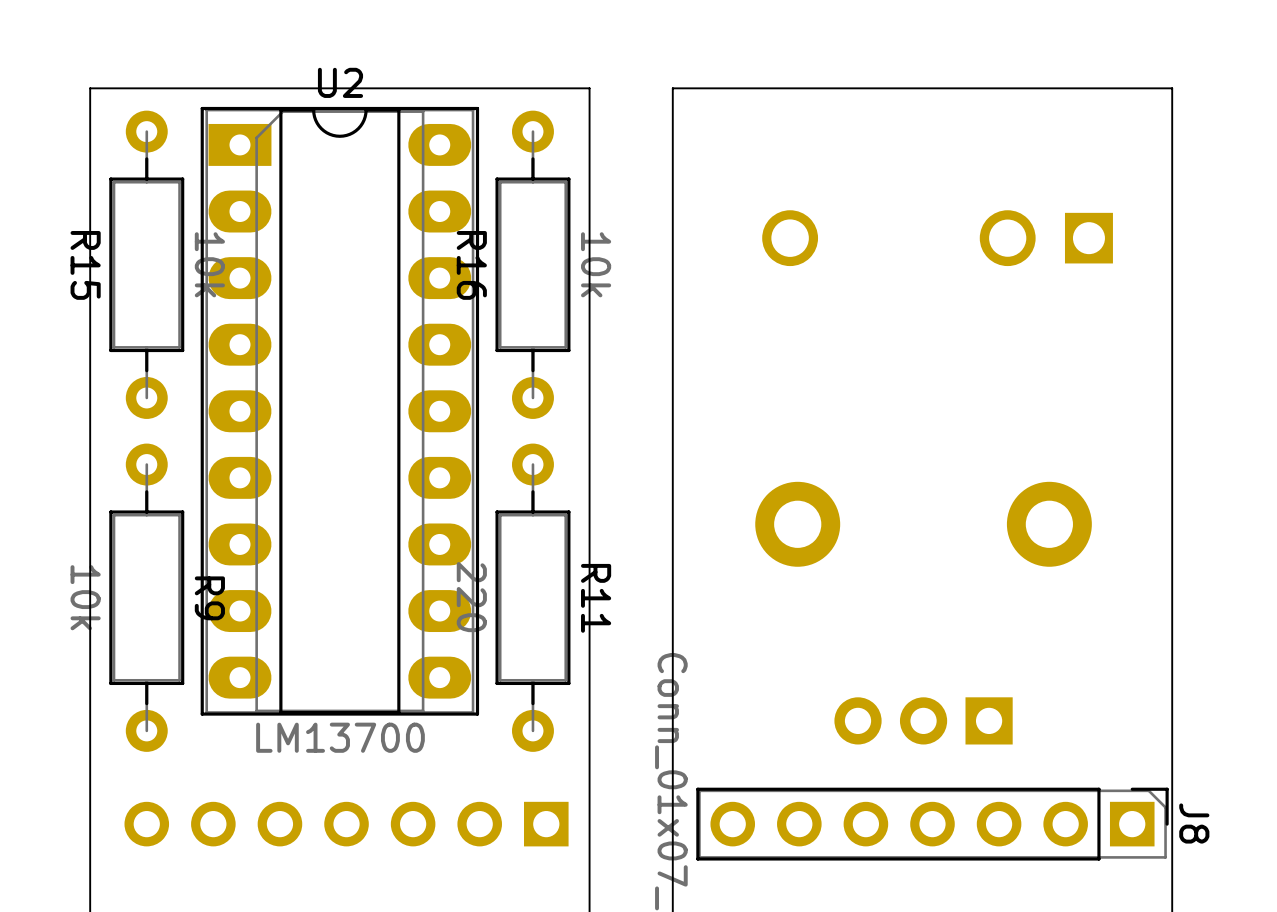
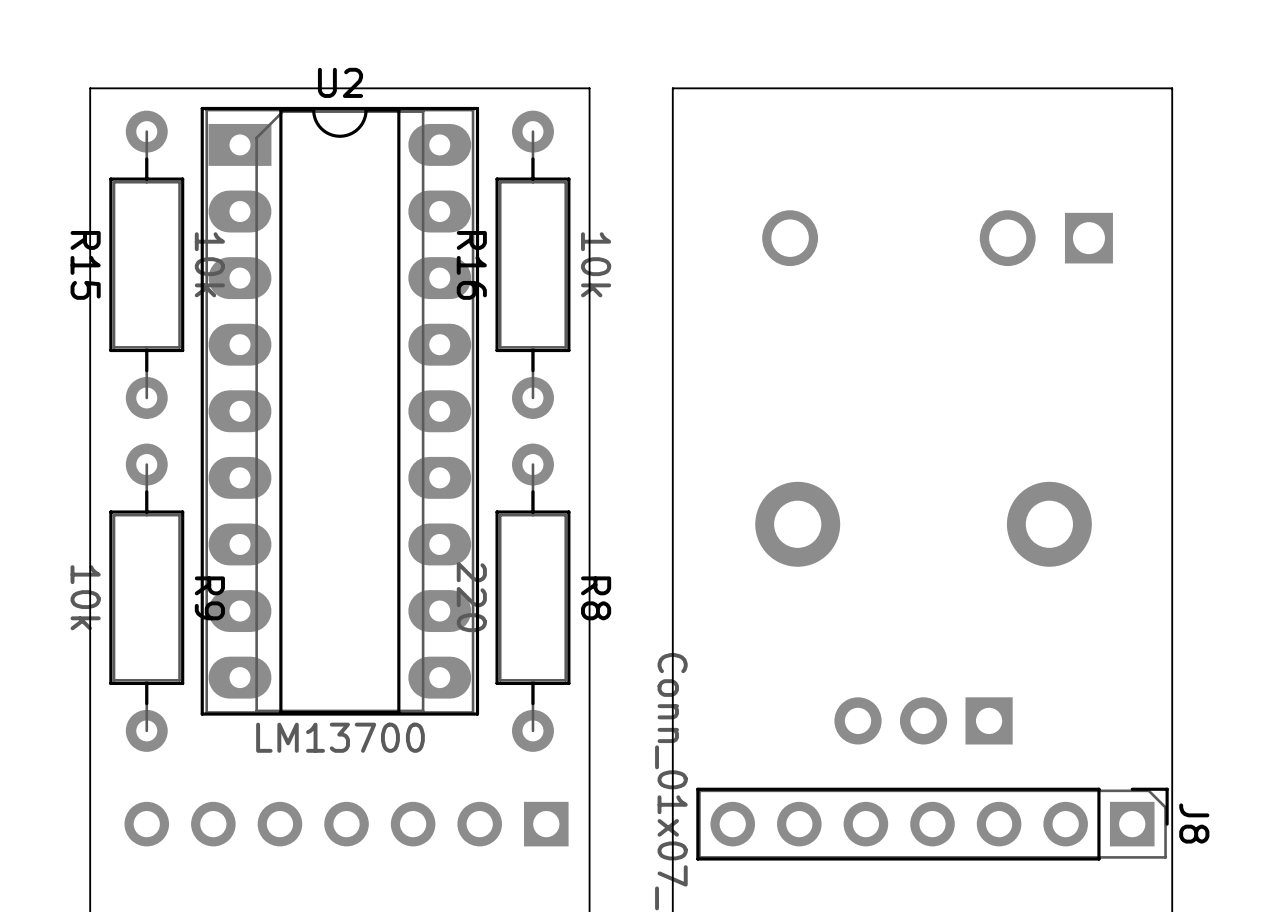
R11 name: R11 (596, 598) -> R8 (596, 598)

